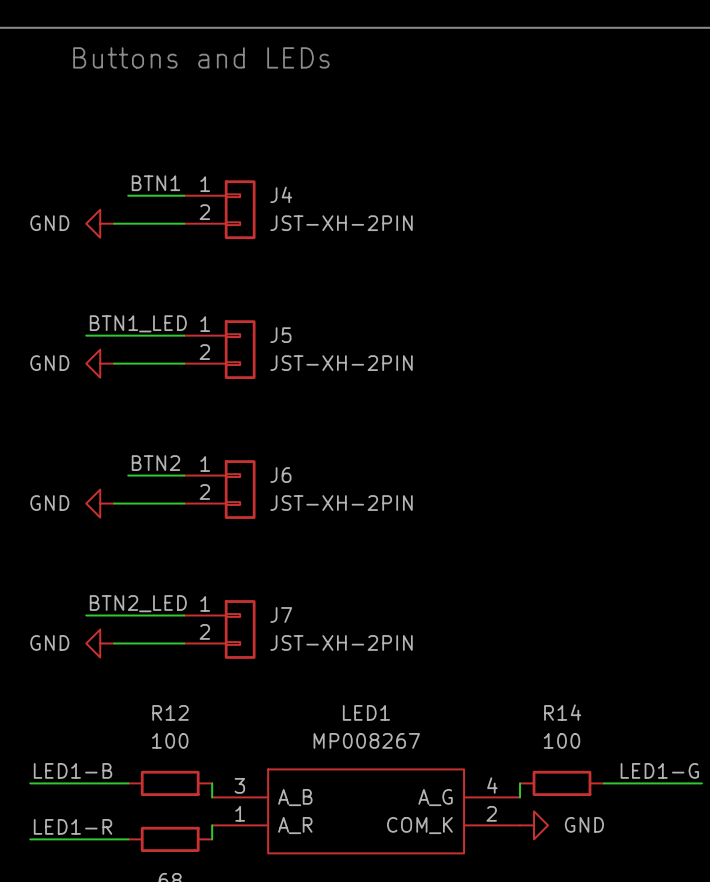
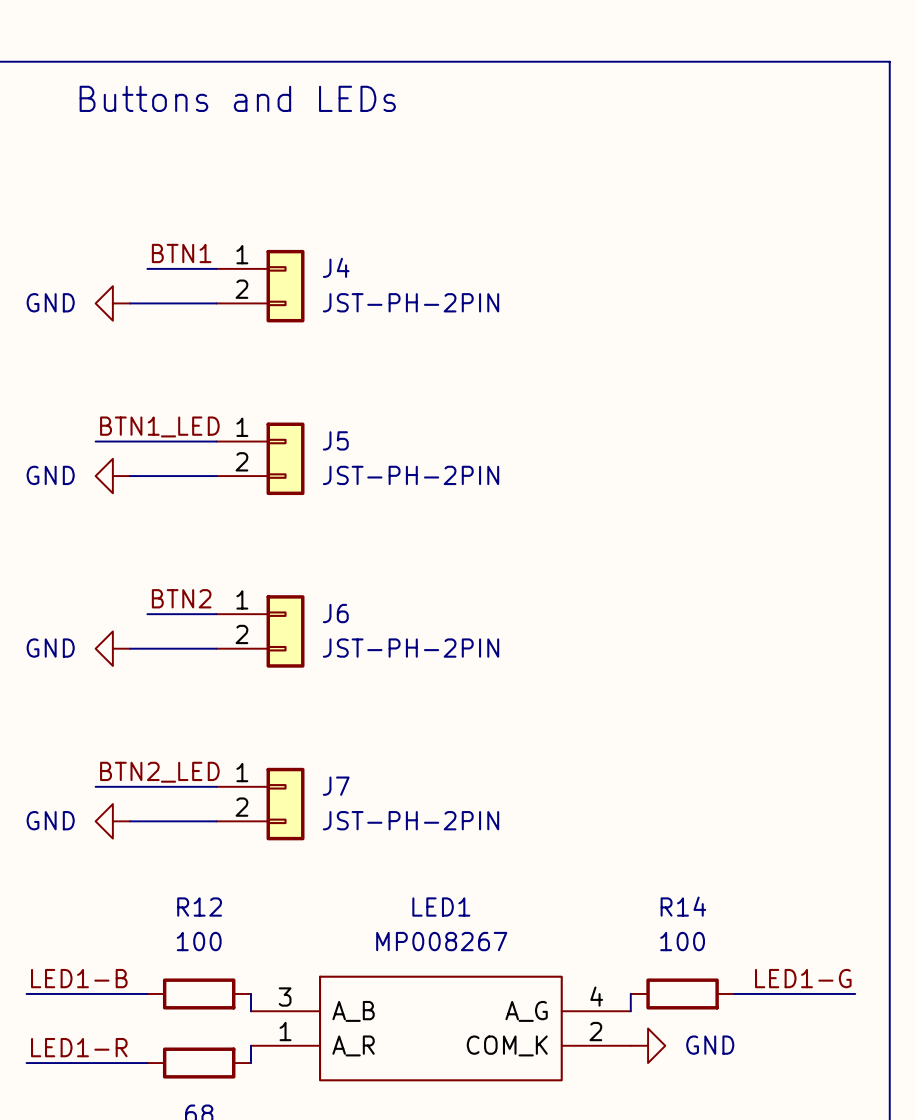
J4 value: JST-XH-2PIN (341, 223) -> JST-PH-2PIN (411, 302)
J5 value: JST-XH-2PIN (341, 363) -> JST-PH-2PIN (411, 475)
J6 value: JST-XH-2PIN (341, 503) -> JST-PH-2PIN (411, 648)
J7 value: JST-XH-2PIN (341, 642) -> JST-PH-2PIN (411, 820)

